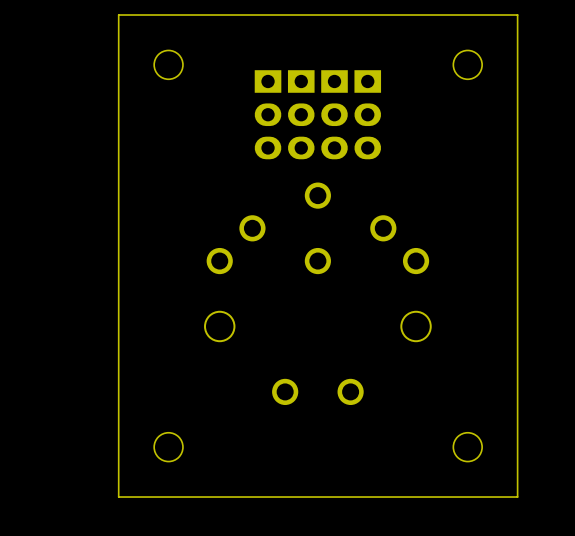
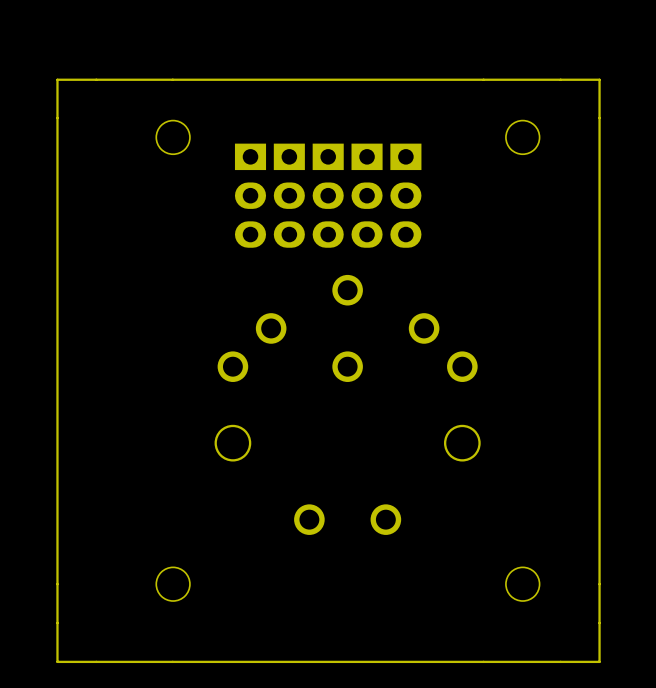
board edge: (517, 15) (517, 497) (118, 497) (118, 15) (517, 15) -> (599, 79) (599, 661) (57, 661) (57, 79) (599, 79)
part: none -> (250, 195)

